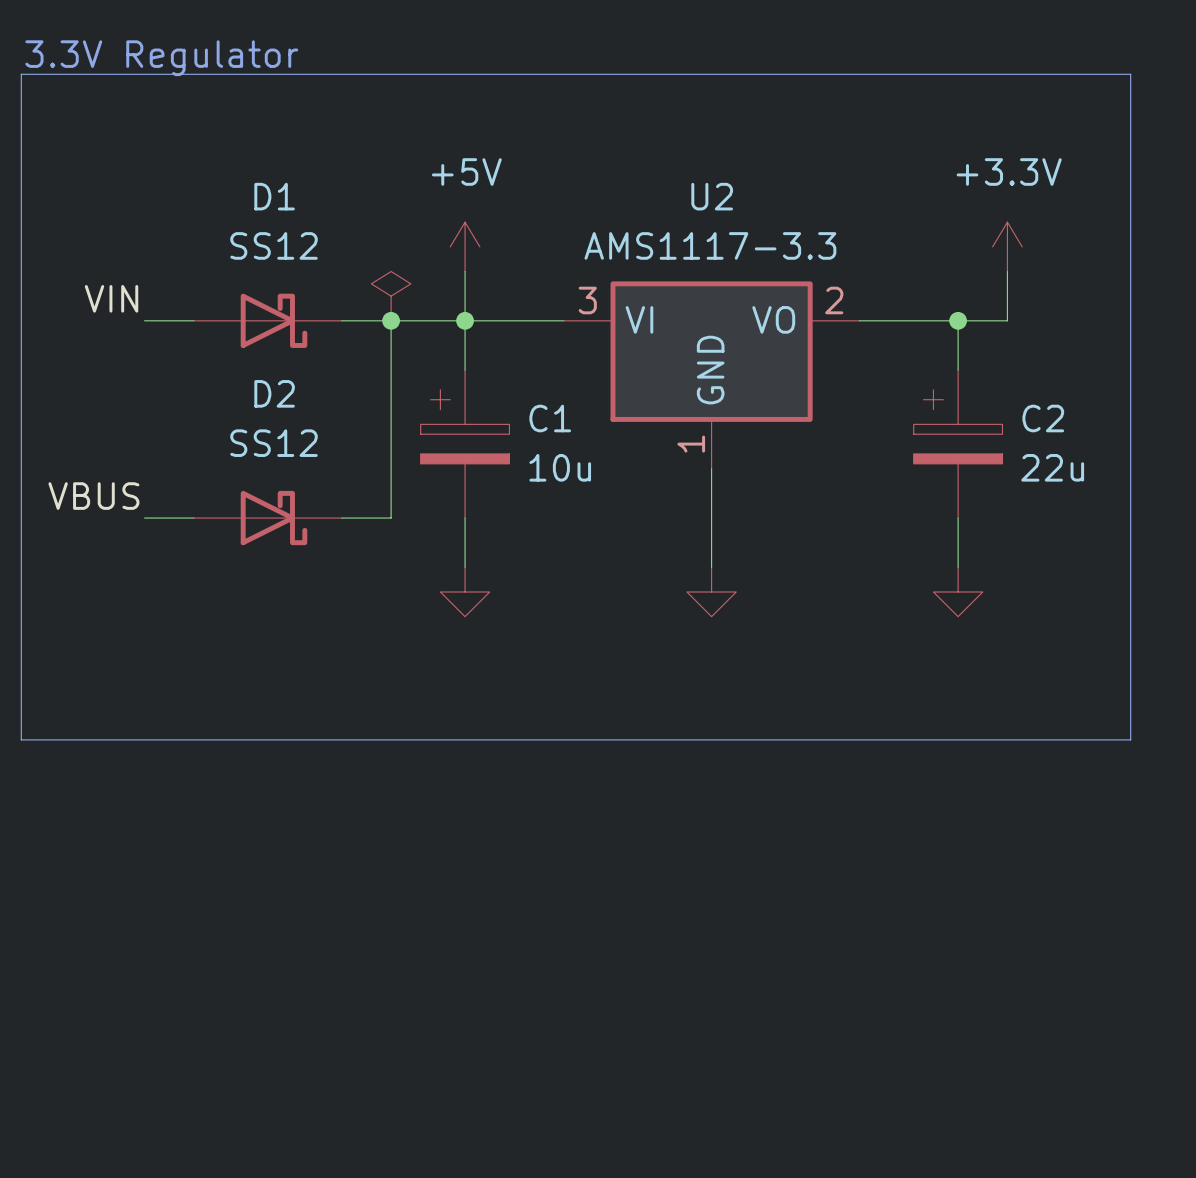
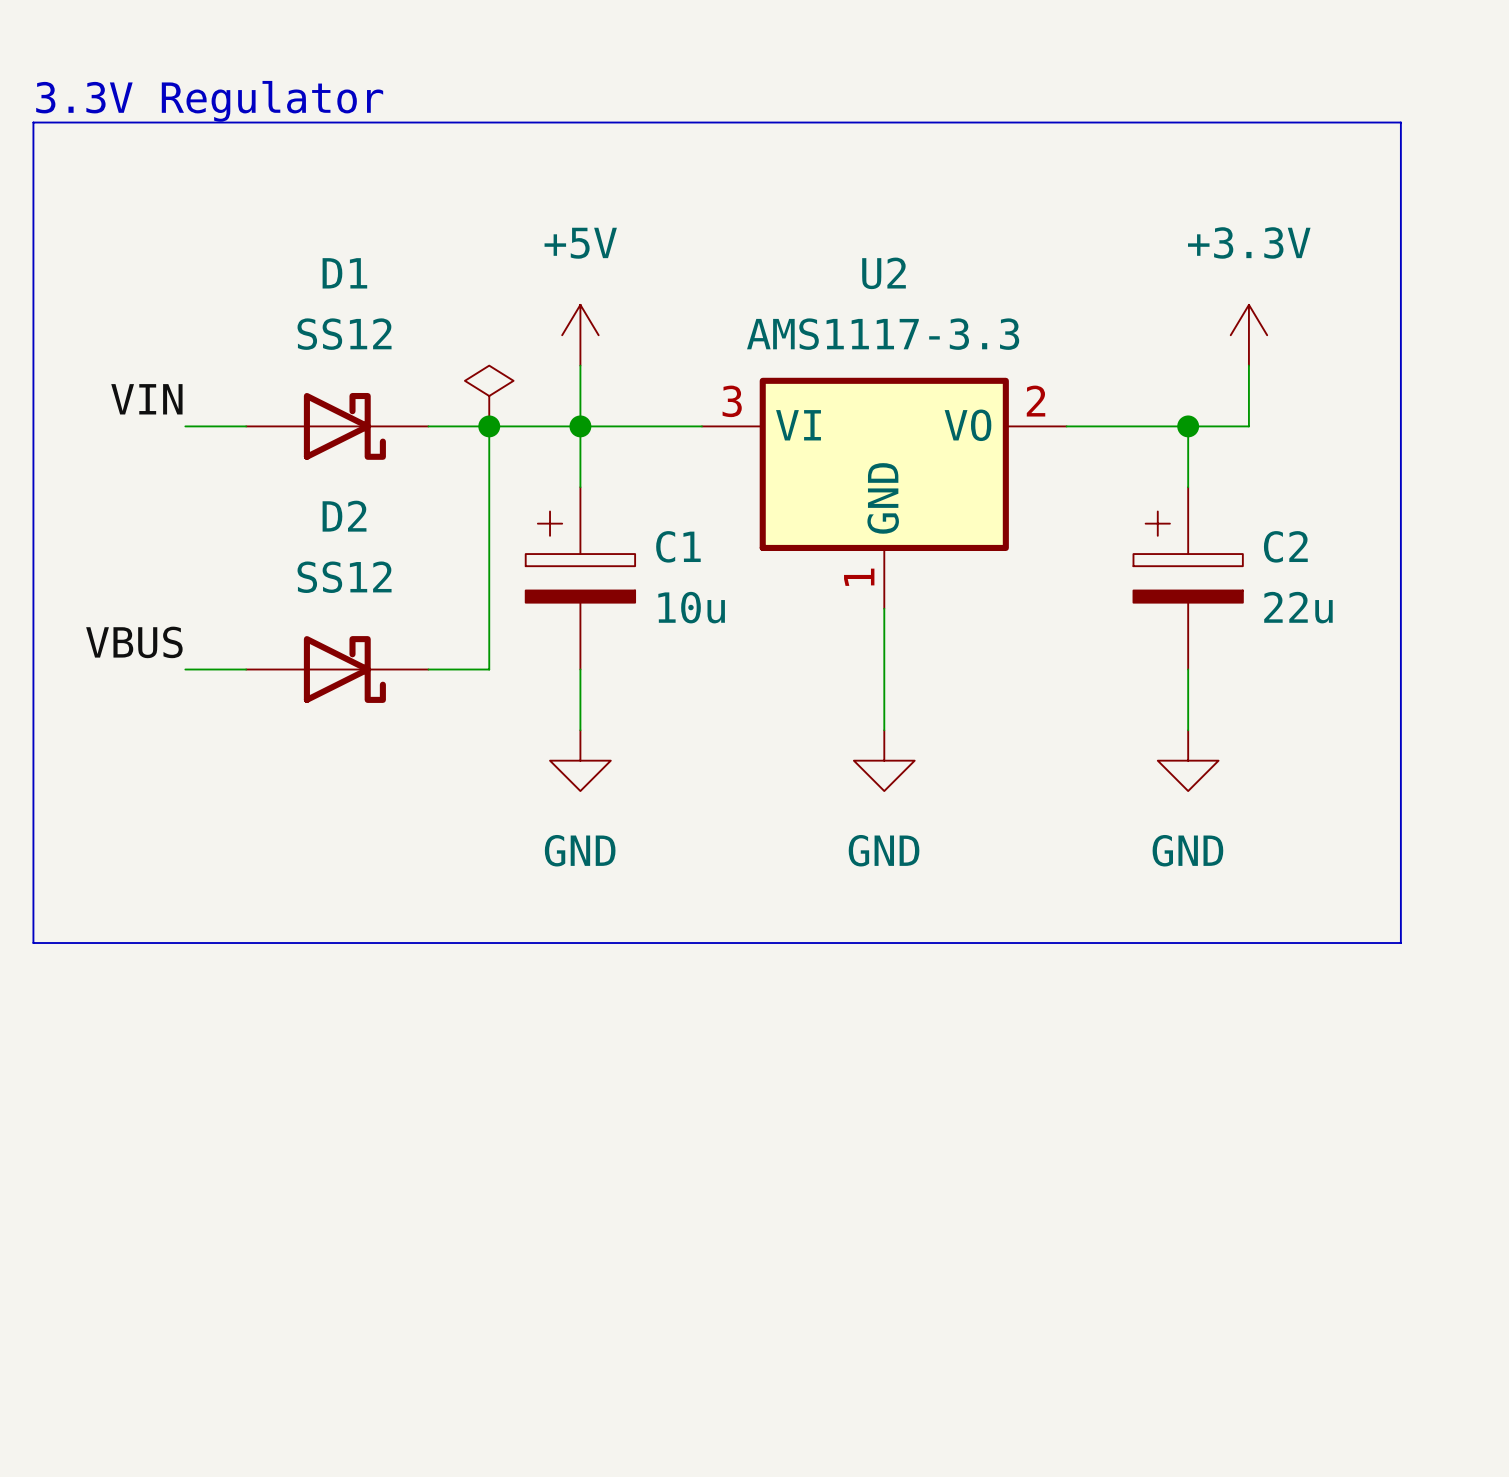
power symbol text: none -> GND (580, 850)
power symbol text: none -> GND (884, 850)
power symbol text: none -> GND (1187, 850)

